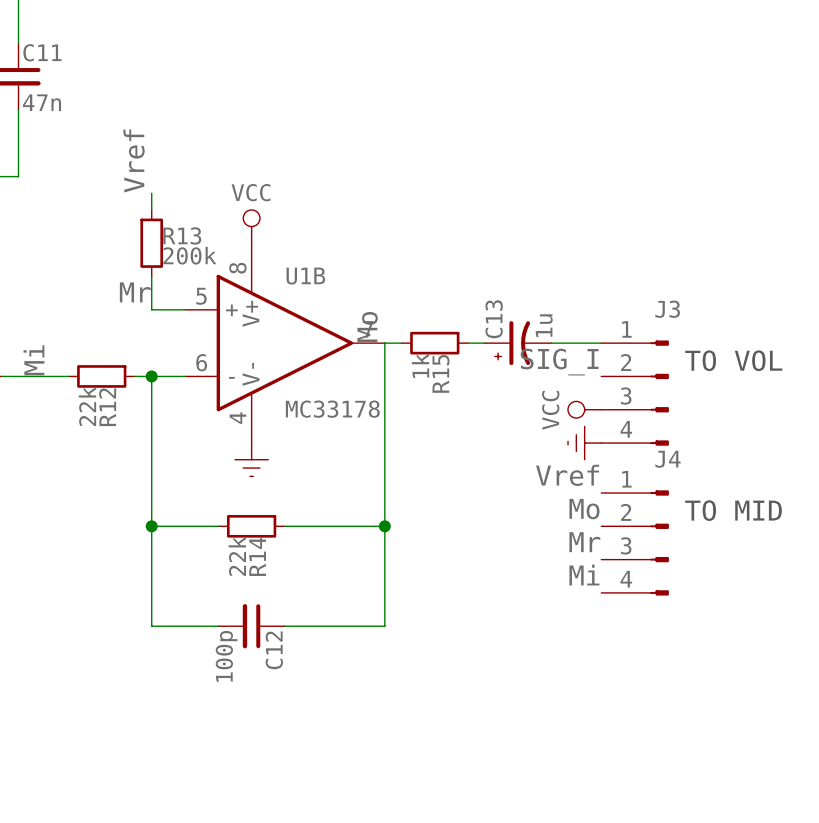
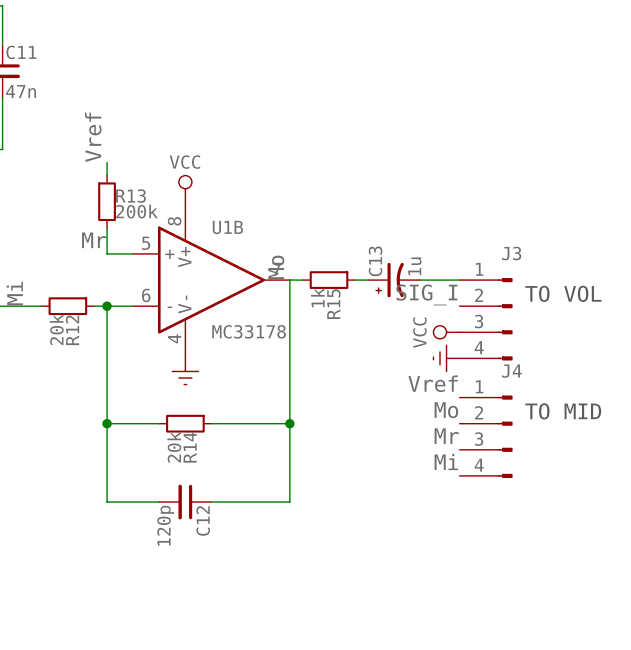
R12 value: 22k (87, 406) -> 20k (56, 329)
R14 value: 22k (237, 556) -> 20k (174, 447)
C12 value: 100p (226, 656) -> 120p (165, 525)

